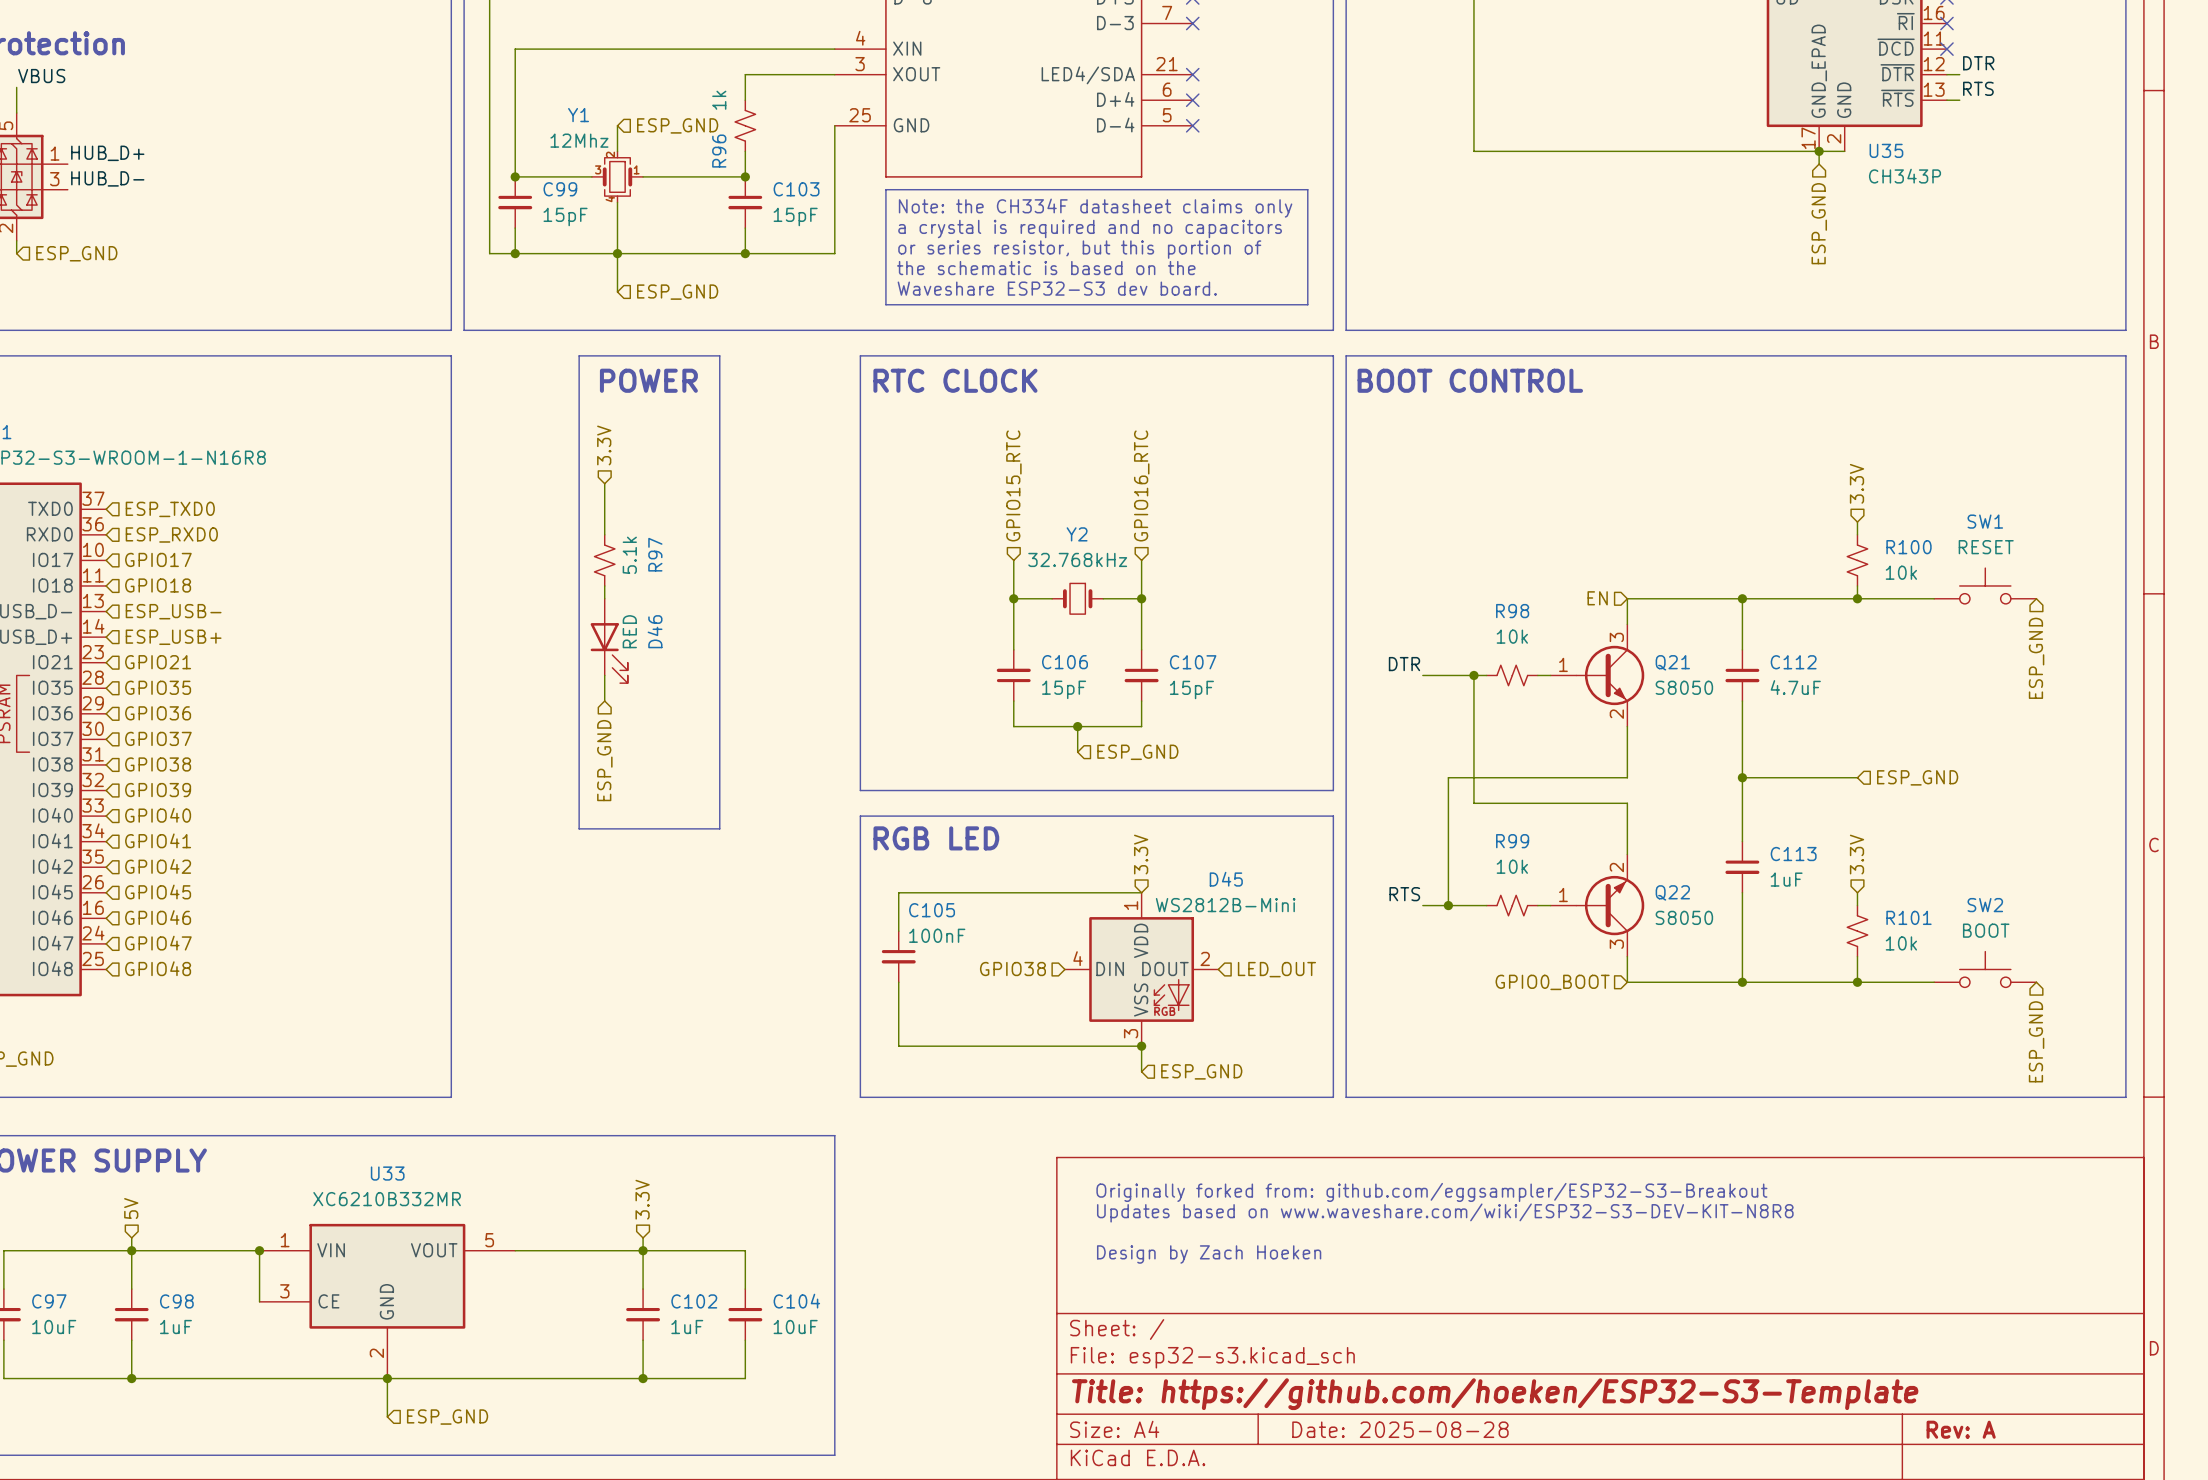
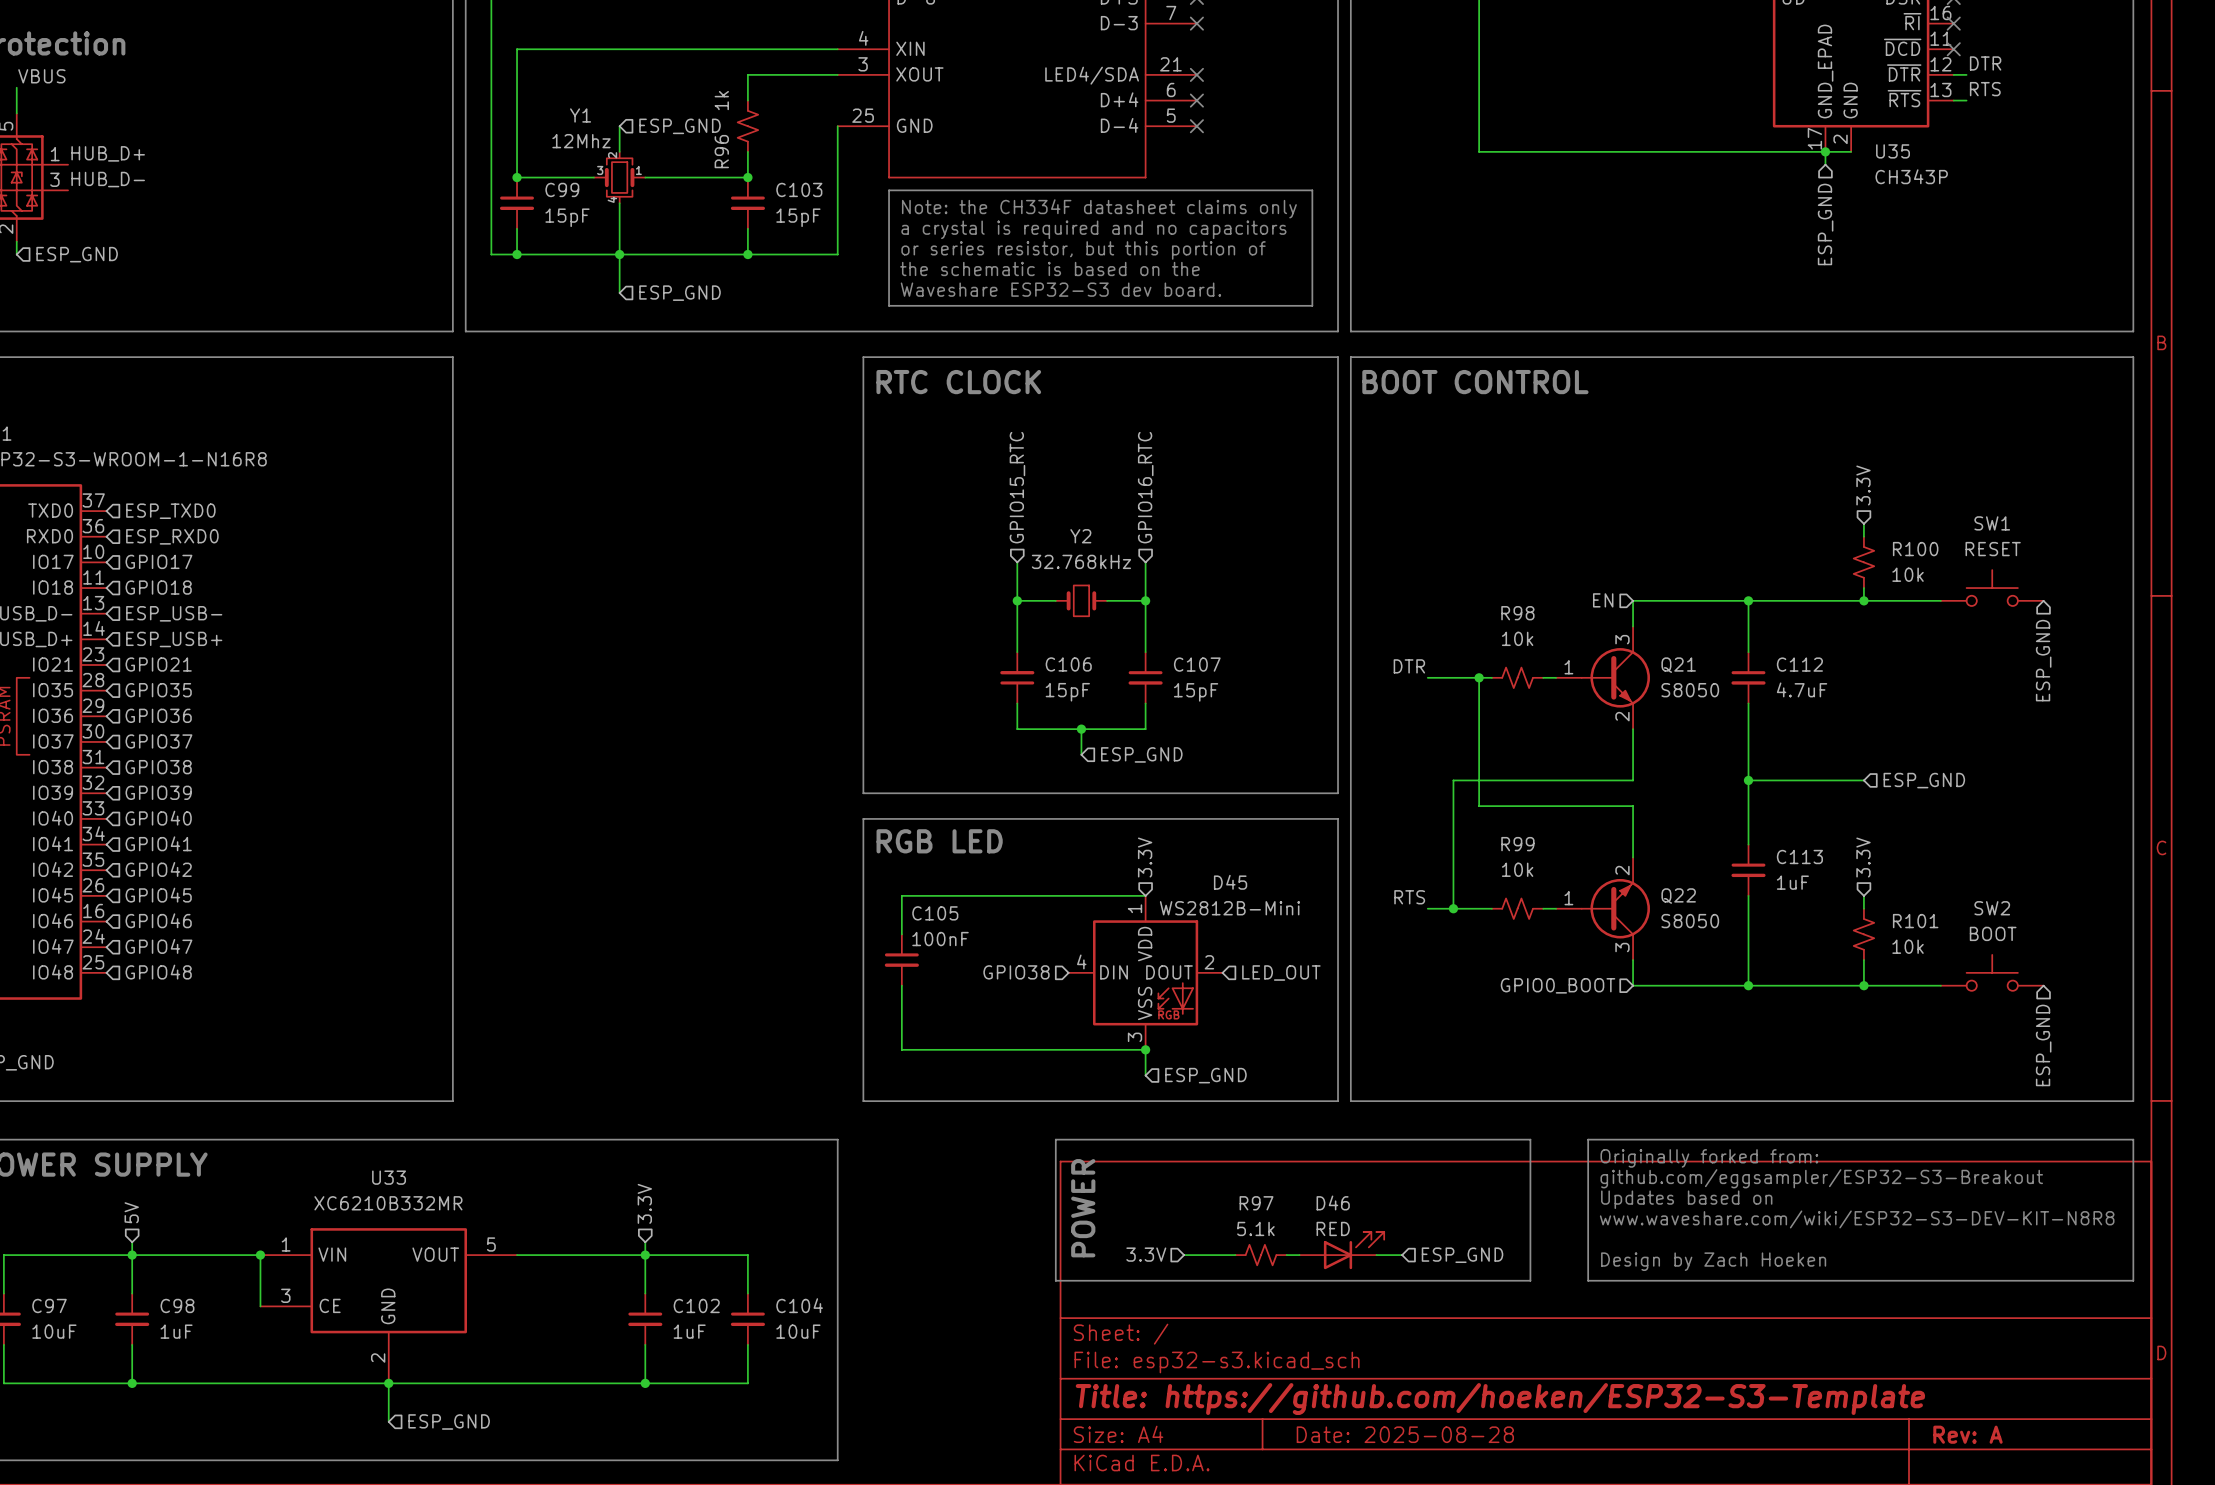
line: (579, 355) (719, 355) (719, 828) (579, 828) (579, 355) -> none
text: POWER (648, 380) -> none
hierarchical label: 3.3V (604, 445) -> none
wire: (604, 483) (604, 534) -> none
R97 name position: R97 (655, 554) -> R97 (1256, 1203)
R97 value position: 5.1k (629, 555) -> 5.1k (1255, 1228)
R97 rotation: 0° (604, 560) -> 90° clockwise (1261, 1255)
R97 position: (604, 560) -> (1261, 1255)
wire: (604, 585) (604, 598) -> none
D46 position: (609, 640) -> (1341, 1250)
D46 rotation: 0° (609, 653) -> 90° counterclockwise (1354, 1250)
wire: (604, 675) (604, 701) -> none
hierarchical label: ESP_GND (604, 760) -> none
line: none -> (1055, 1139) (1530, 1139) (1530, 1280) (1055, 1280) (1055, 1139)
line: none -> (1588, 1139) (2133, 1139) (2133, 1280) (1588, 1280) (1588, 1139)
text: none -> Originally forked from: (1709, 1158)
text: none -> github.com/eggsampler/ESP32-S3-Breakout (1821, 1178)
text: Originally forked from: github.com/eggsampler/ESP32-S3-Breakout (1431, 1192) -> none
text: none -> Updates based on (1686, 1199)
text: none -> POWER (1083, 1208)
text: Updates based on www.waveshare.com/wiki/ESP32-S3-DEV-KIT-N8R8 (1445, 1213) -> none
text: none -> www.waveshare.com/wiki/ESP32-S3-DEV-KIT-N8R8 (1857, 1219)
hierarchical label: none -> 3.3V (1146, 1254)
wire: none -> (1184, 1255) (1235, 1255)
wire: none -> (1286, 1255) (1299, 1255)
wire: none -> (1376, 1255) (1402, 1255)
hierarchical label: none -> ESP_GND (1462, 1255)
text: Design by Zach Hoeken (1209, 1254) -> none
text: none -> Design by Zach Hoeken (1713, 1261)

